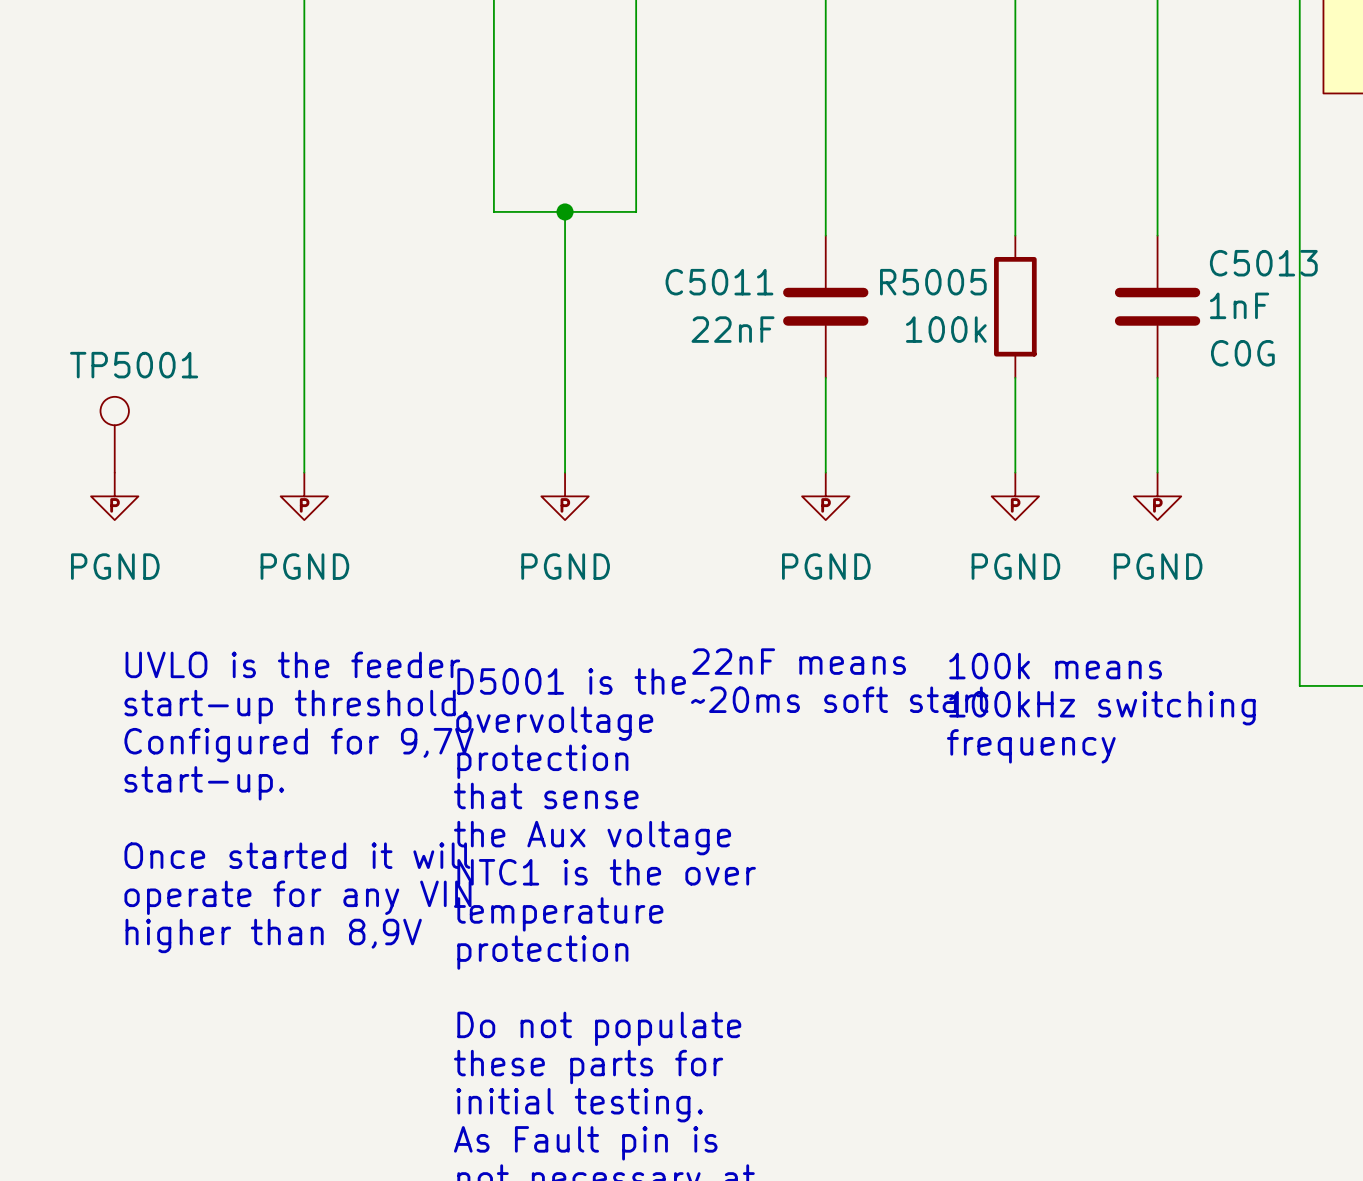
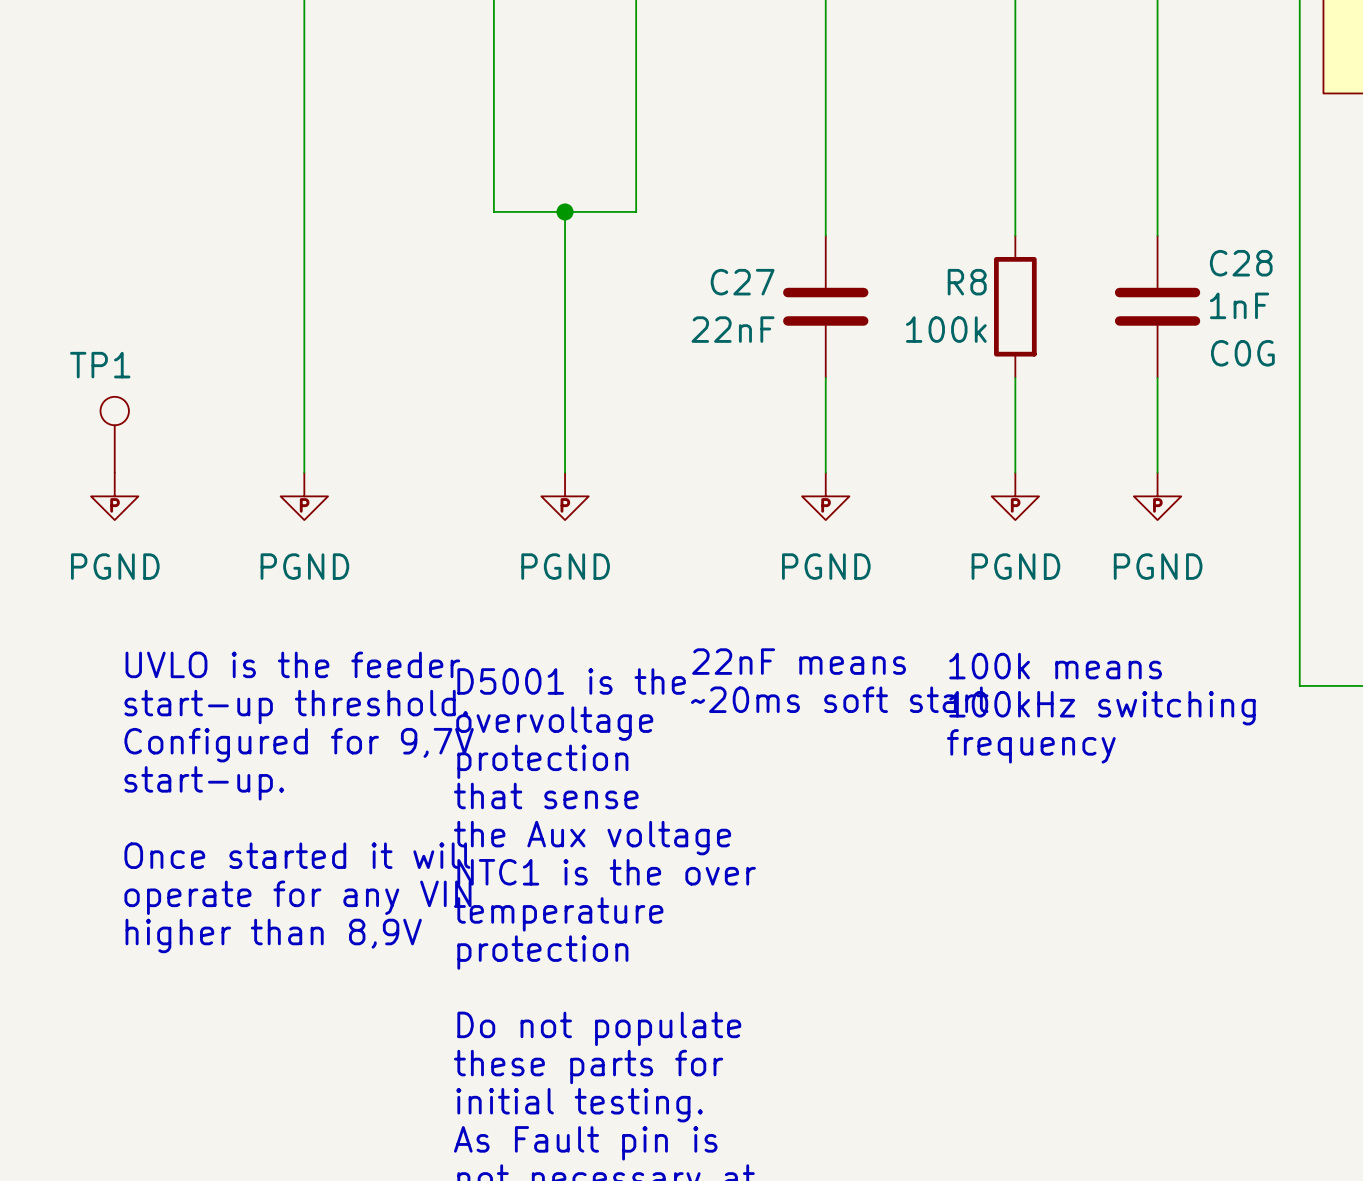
C5013 name: C5013 (1263, 263) -> C28 (1241, 263)
C5011 name: C5011 (719, 282) -> C27 (742, 282)
R5005 name: R5005 (933, 282) -> R8 (967, 282)
TP5001 name: TP5001 (134, 365) -> TP1 (100, 365)

